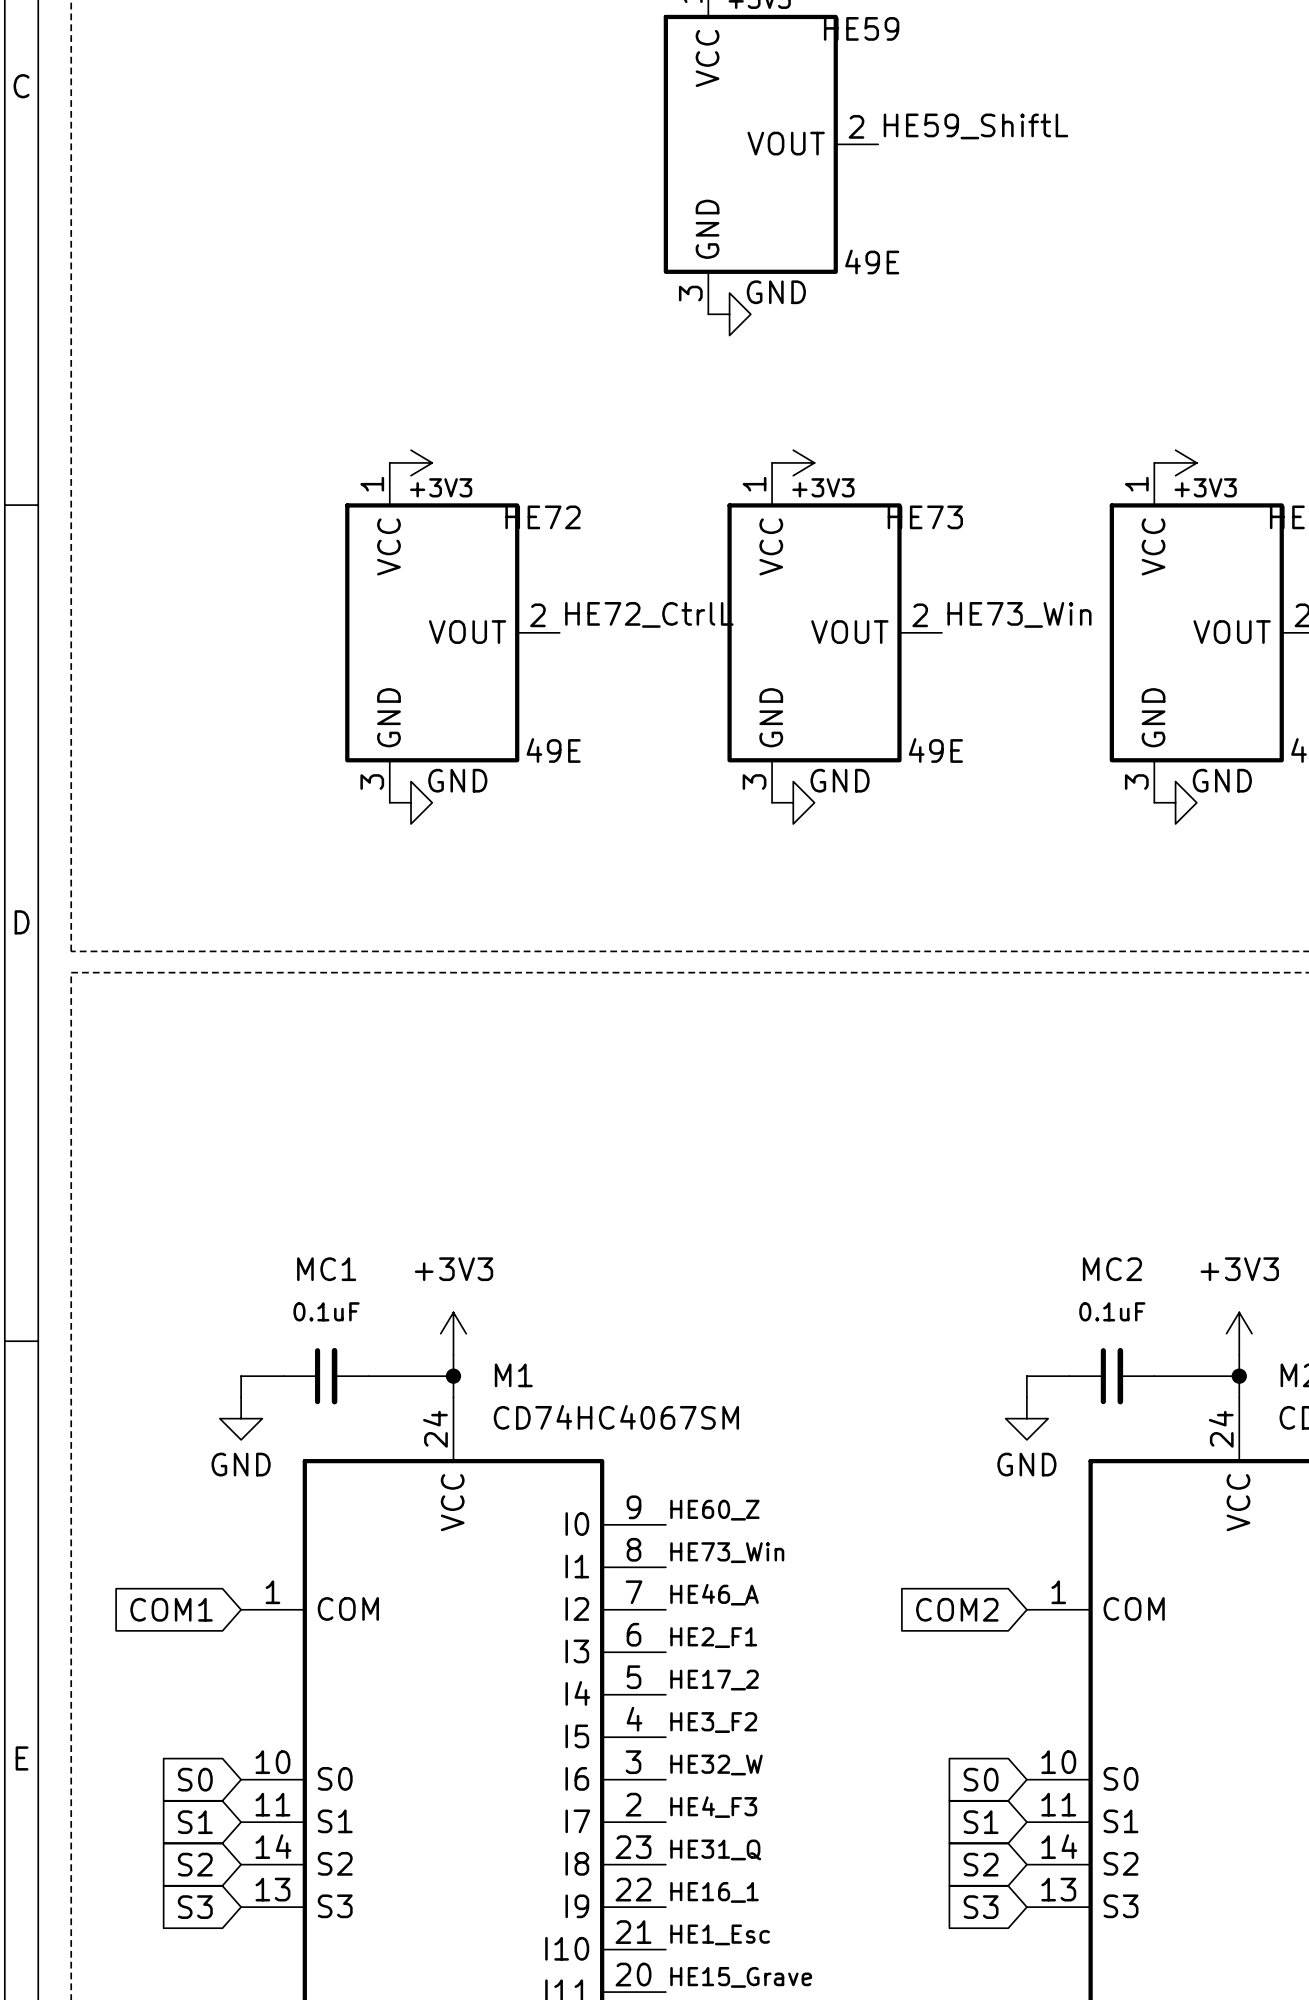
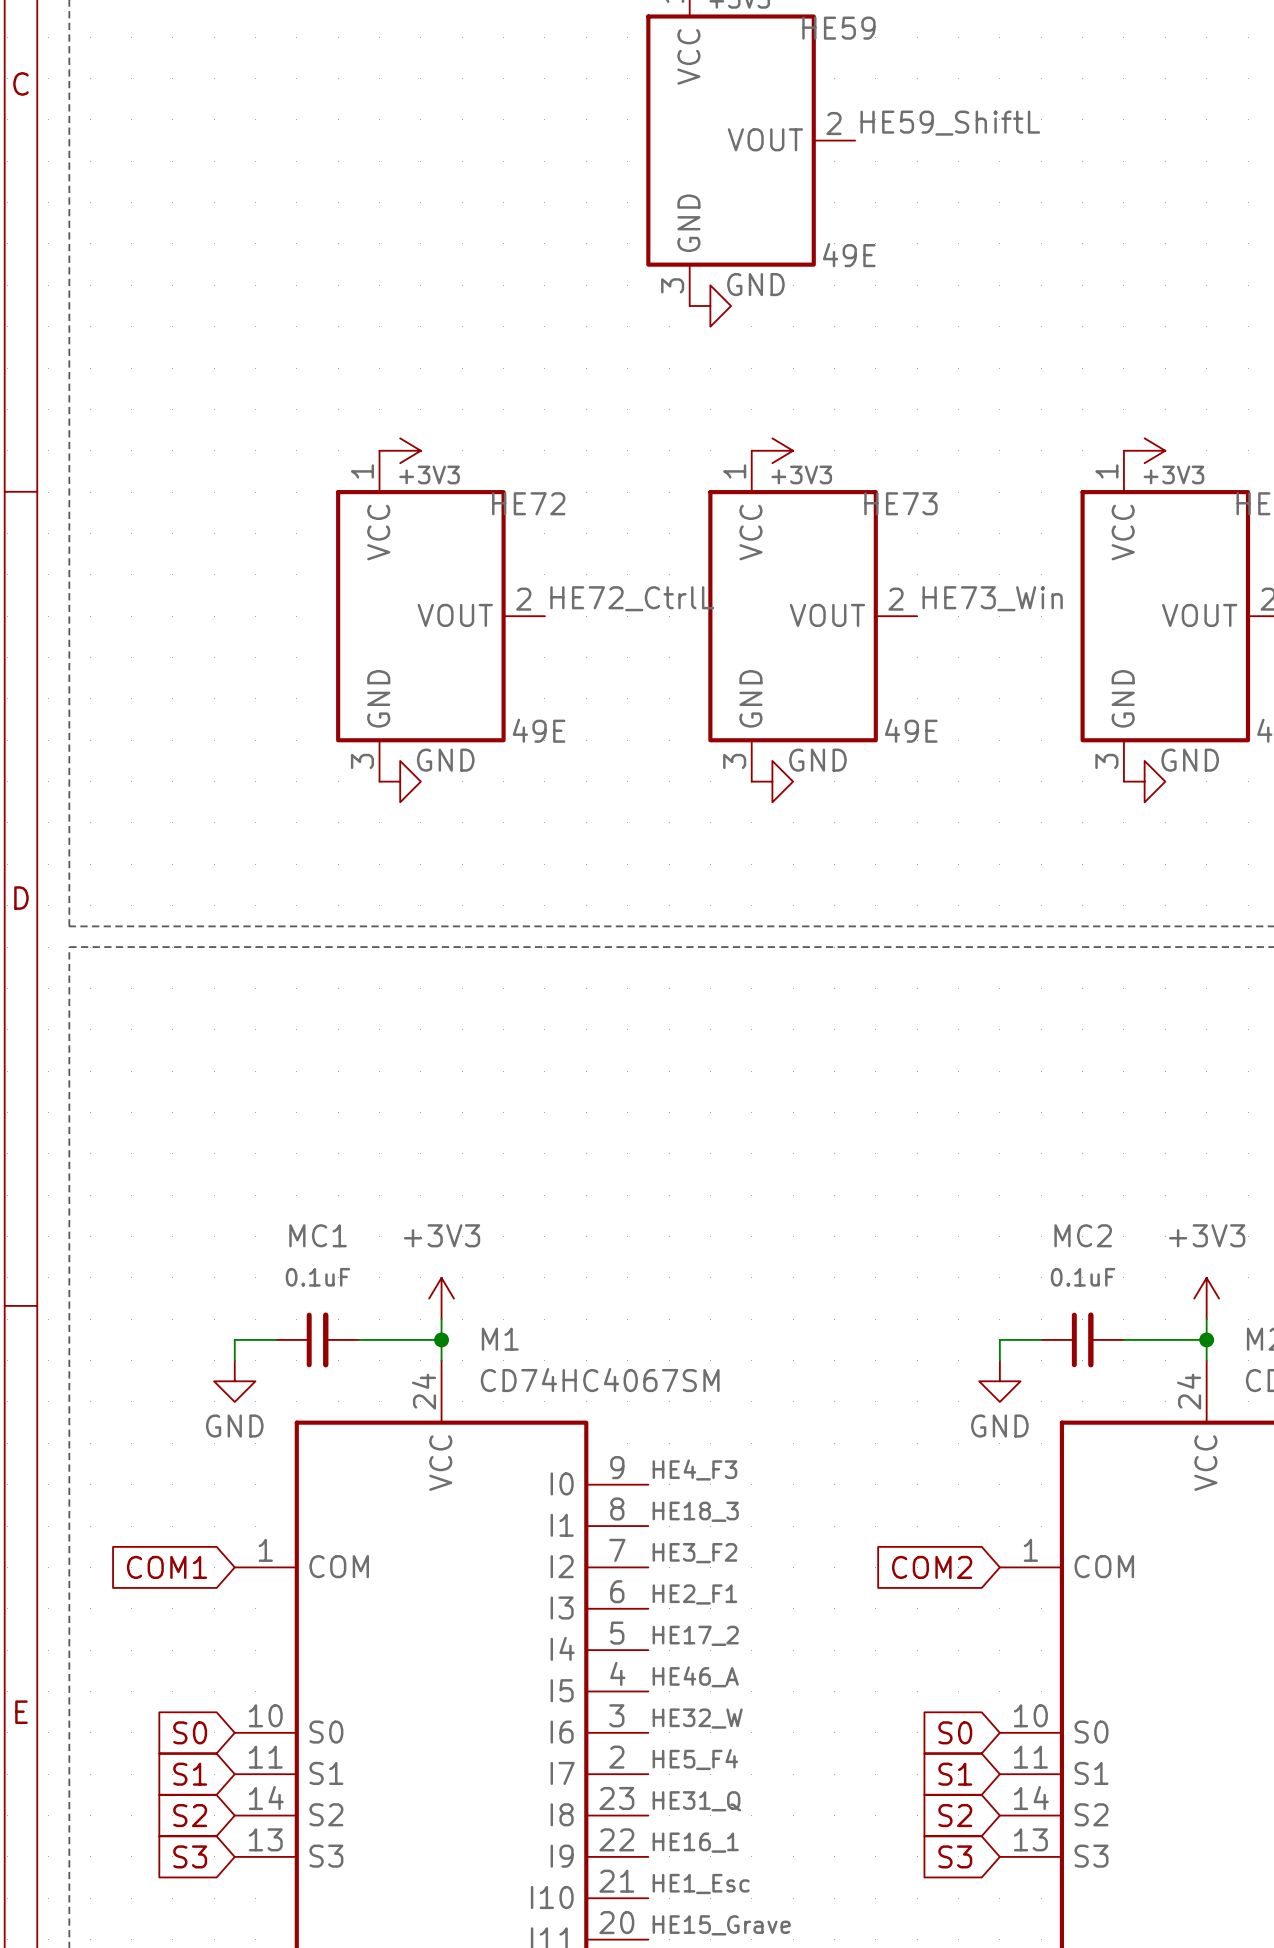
label: HE60_Z (714, 1510) -> HE4_F3 (694, 1470)
label: HE73_Win (727, 1552) -> HE18_3 (695, 1511)
label: HE46_A (714, 1594) -> HE3_F2 (694, 1553)
label: HE3_F2 (713, 1722) -> HE46_A (695, 1676)
label: HE4_F3 (713, 1807) -> HE5_F4 (695, 1759)

